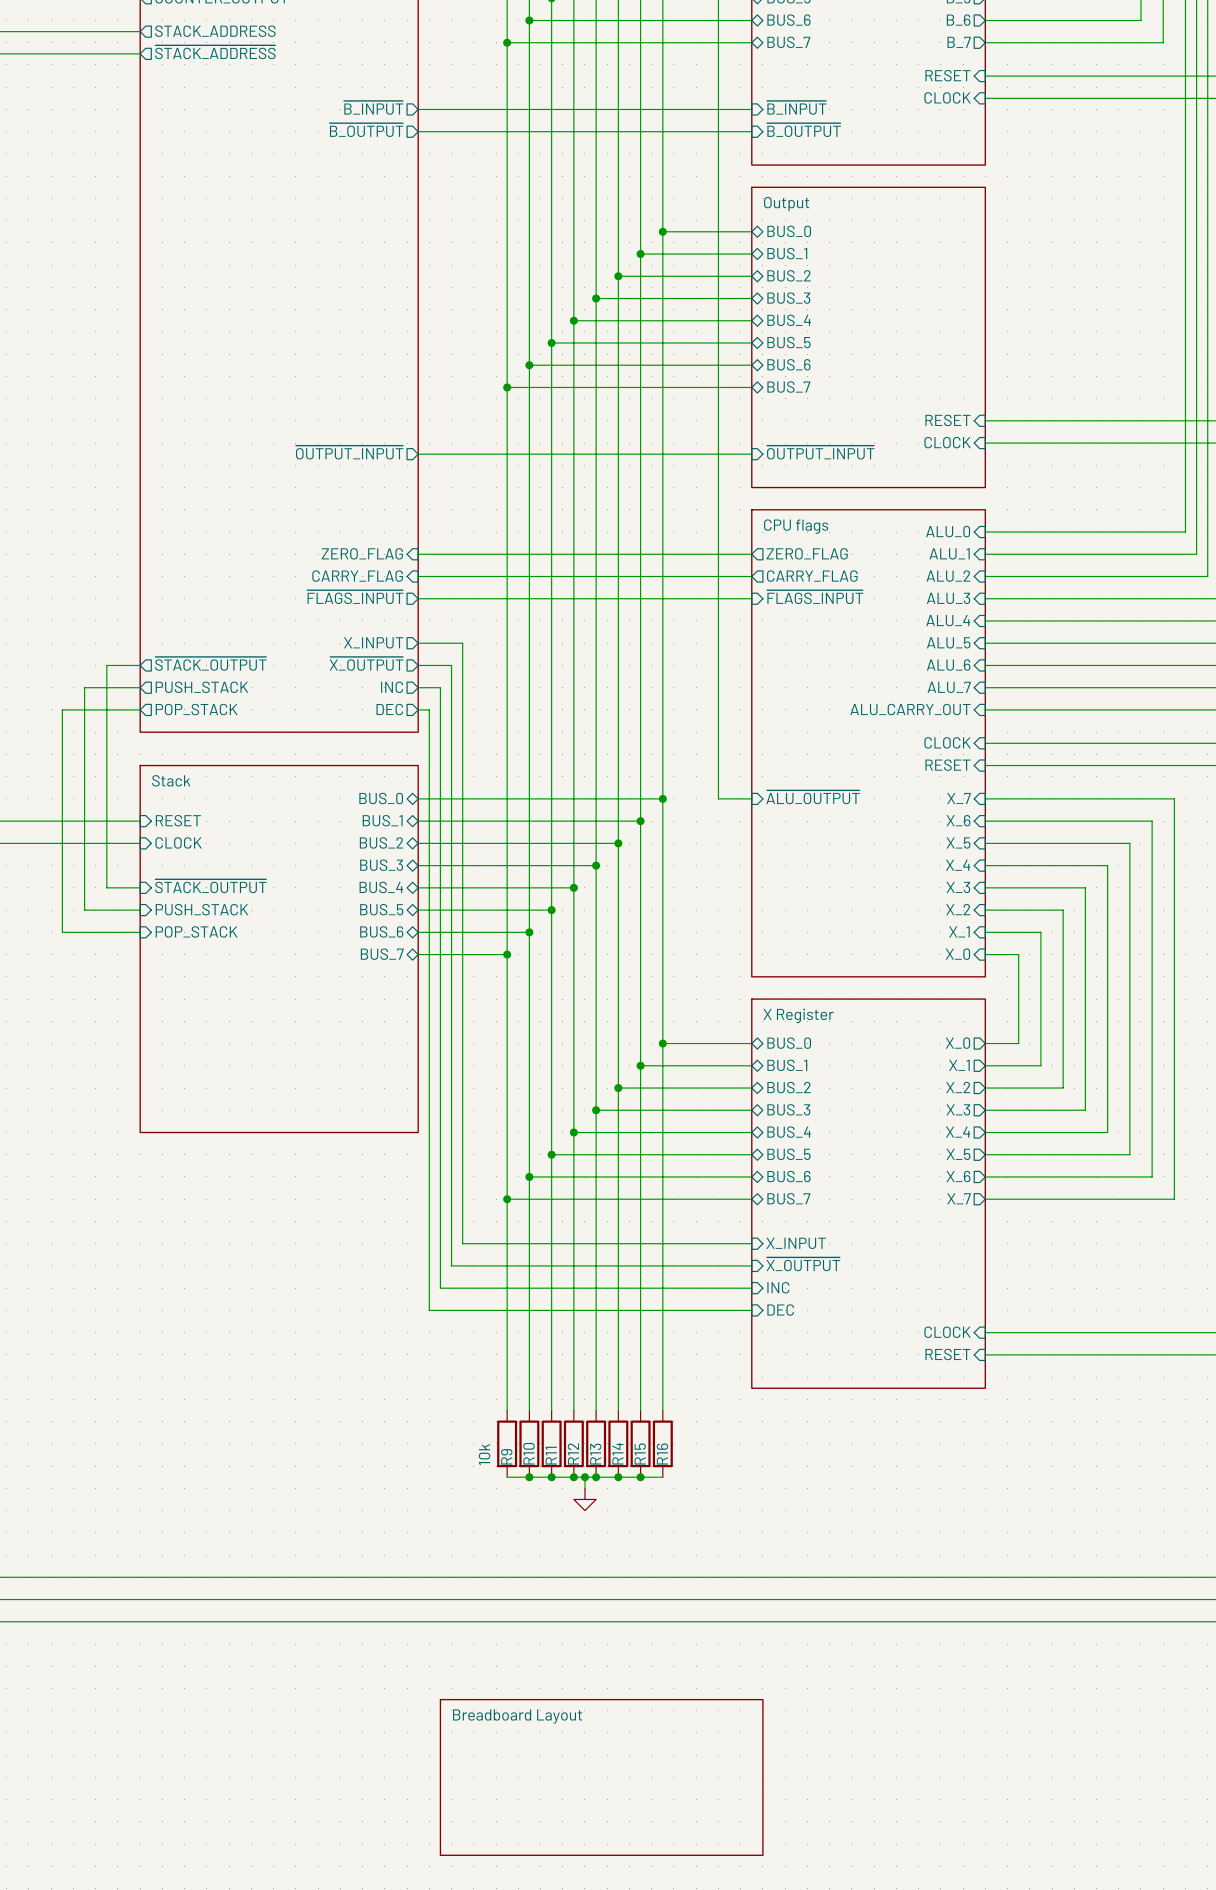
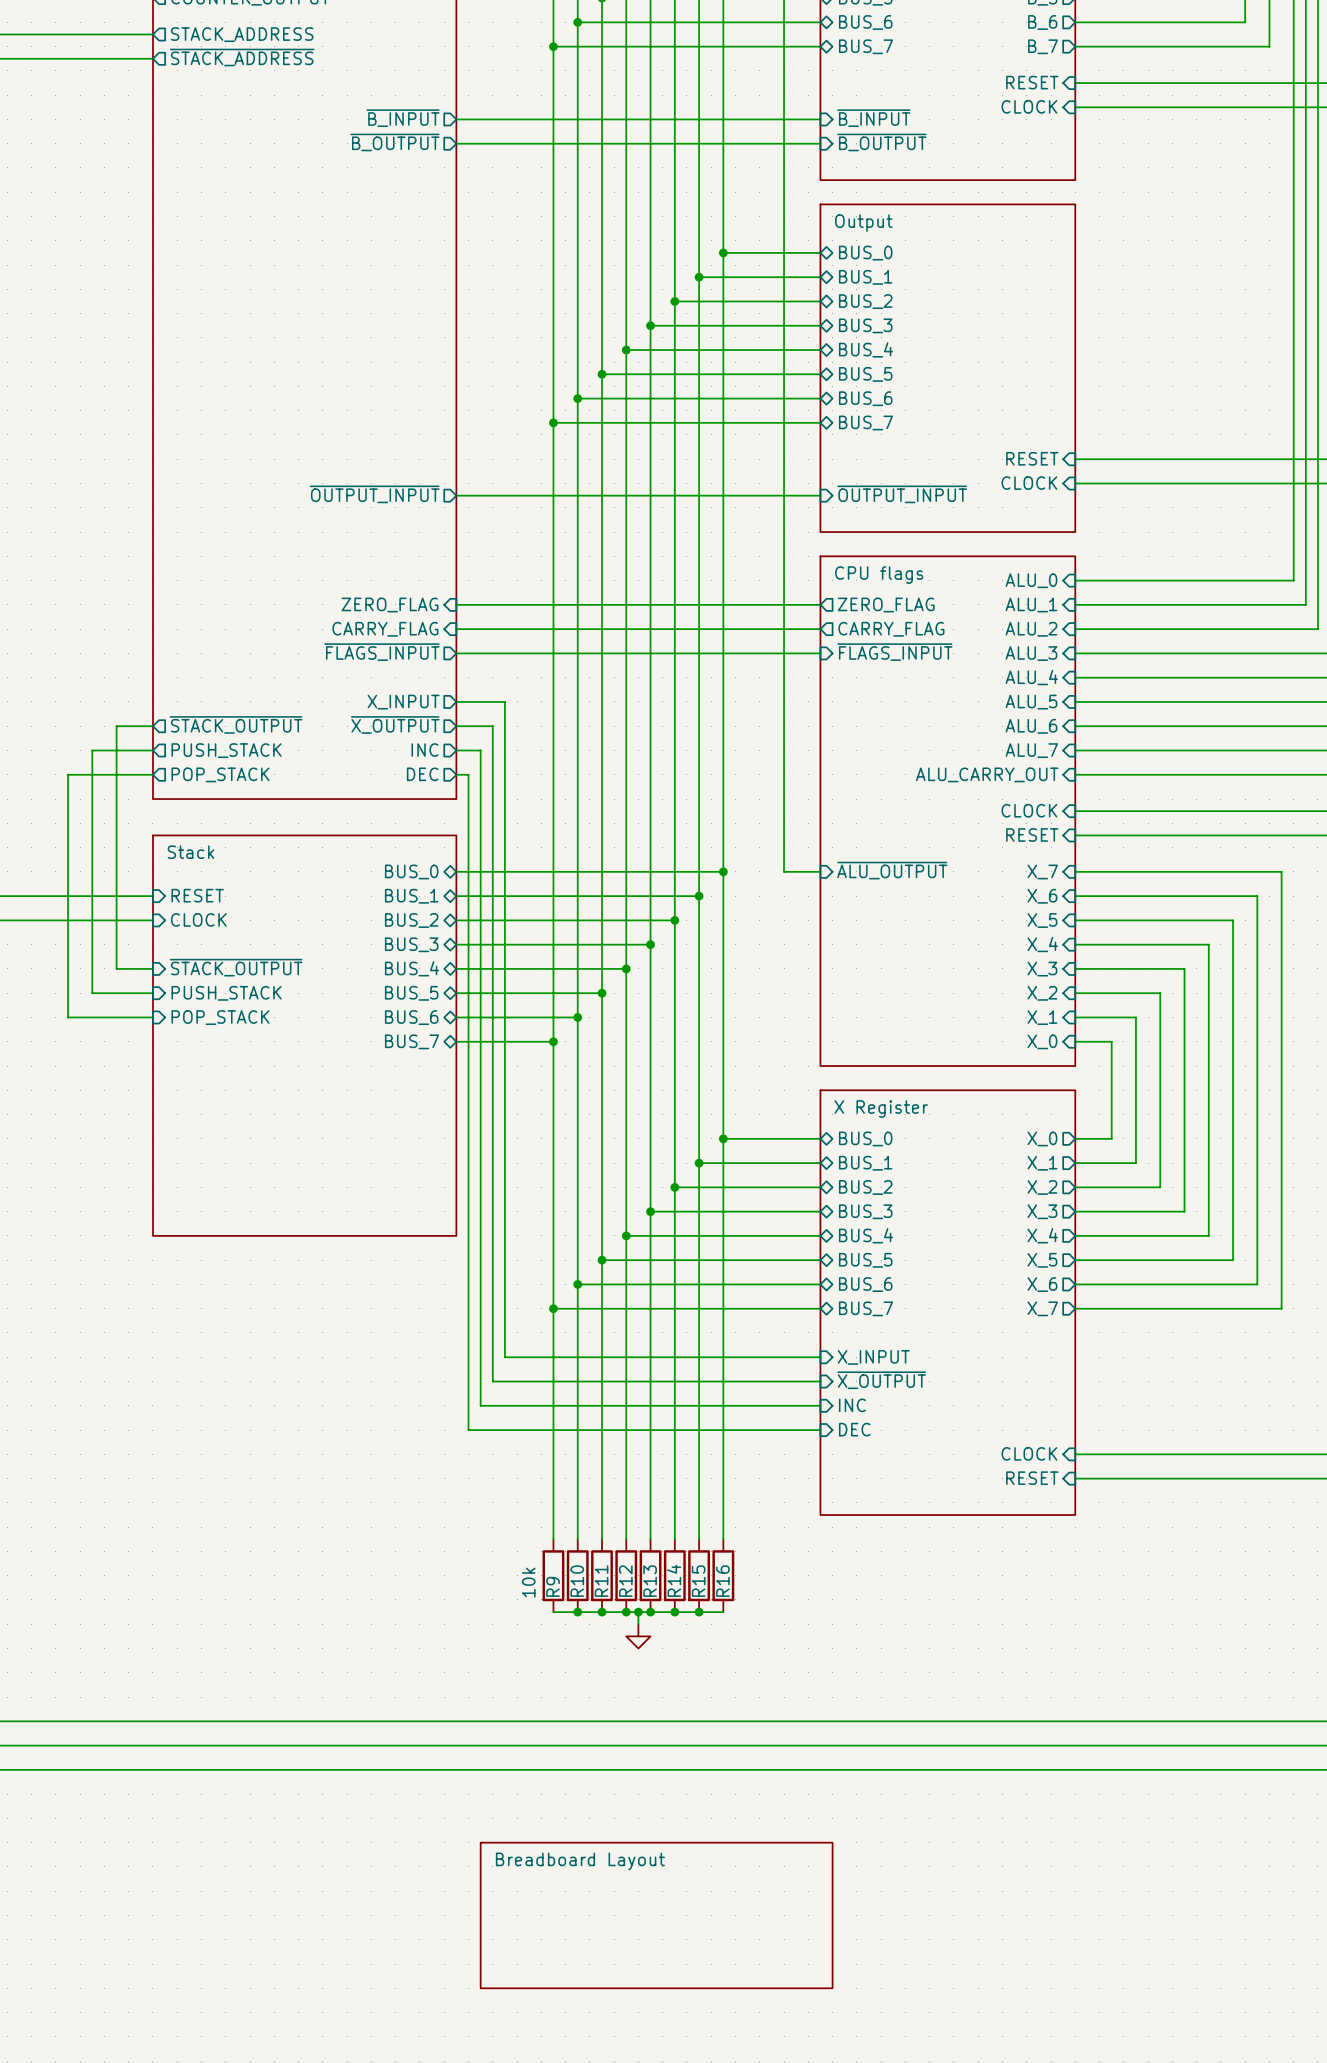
sheet Breadboard Layout: none -> (656, 1915)
sheet Breadboard Layout: (601, 1777) -> none

